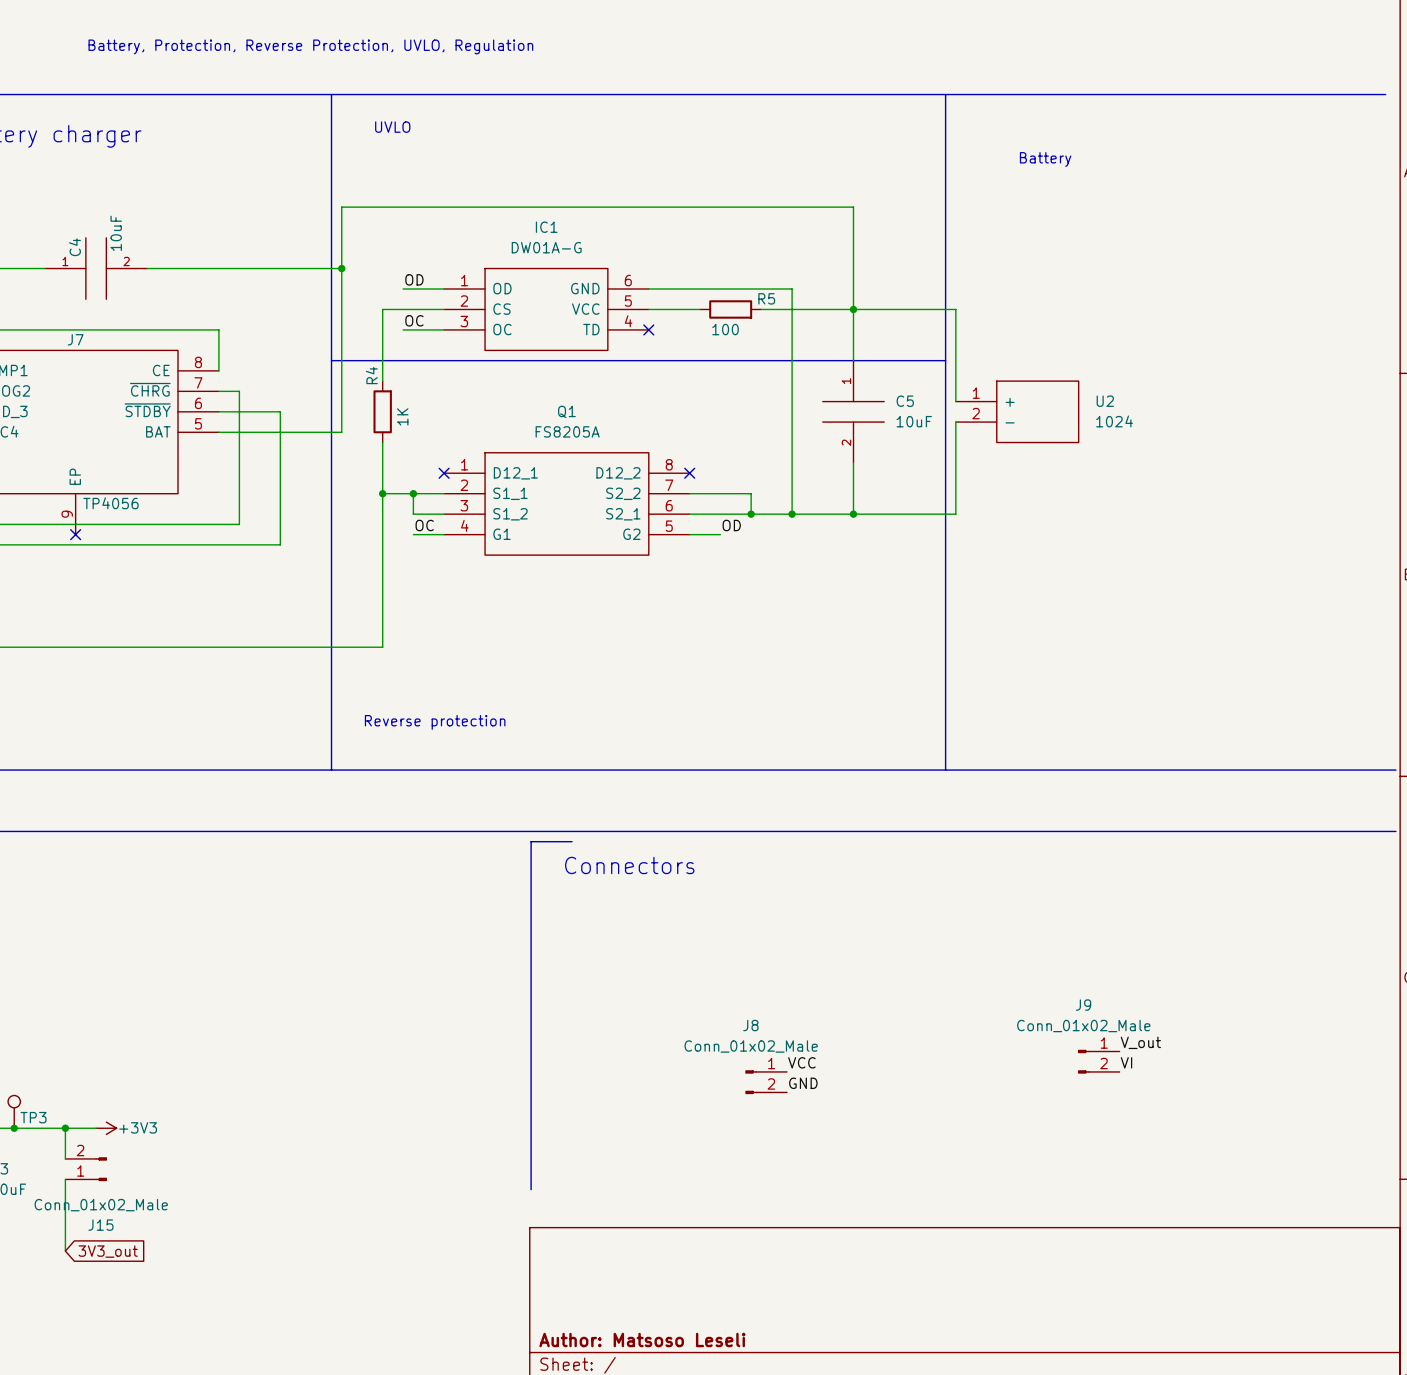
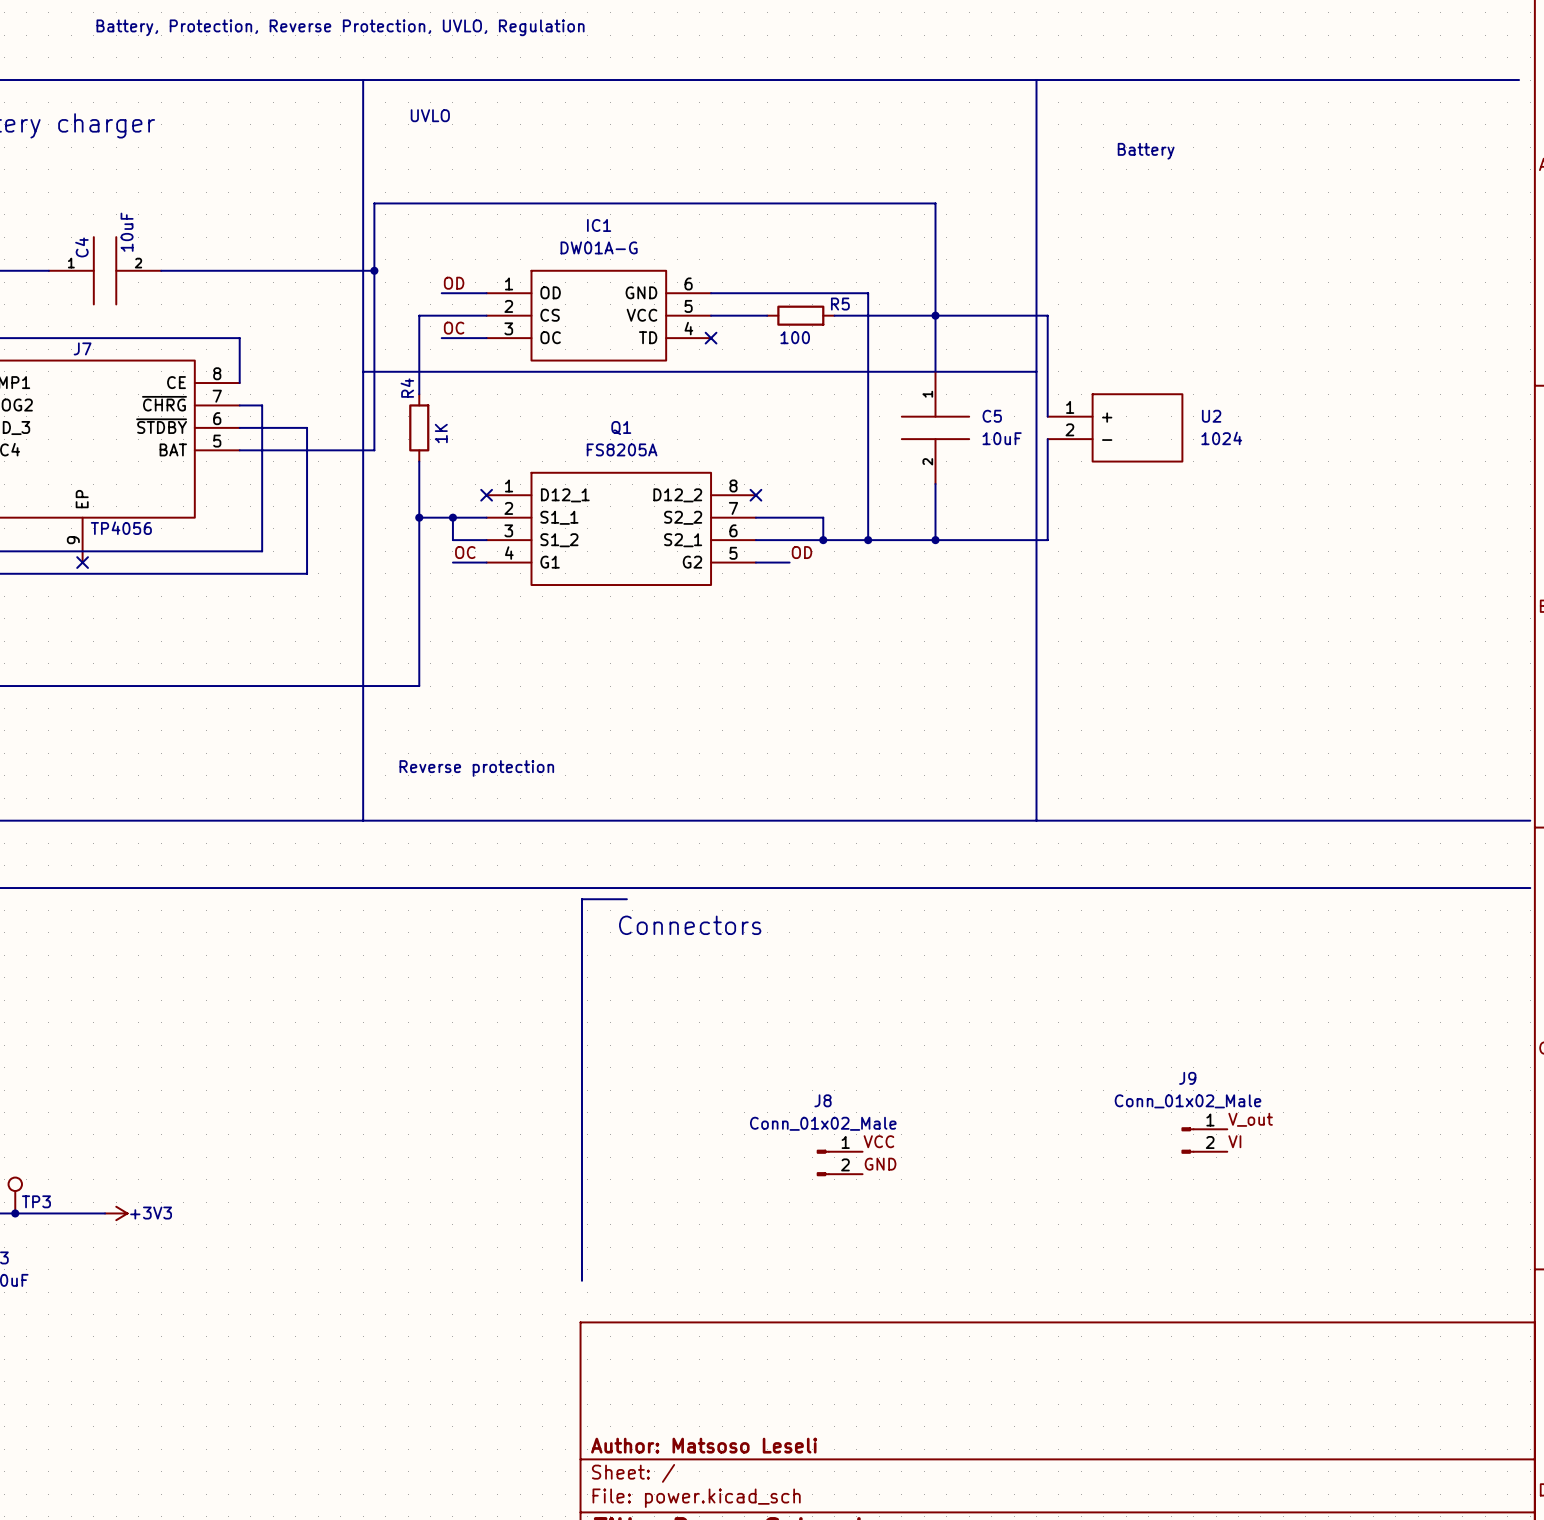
wire: (65, 1128) (65, 1158) -> none
junction: (65, 1128) -> none
J15: Conn_01x02_Male (86, 1169) -> none
wire: (65, 1179) (65, 1251) -> none
global label: 3V3_out (108, 1251) -> none

